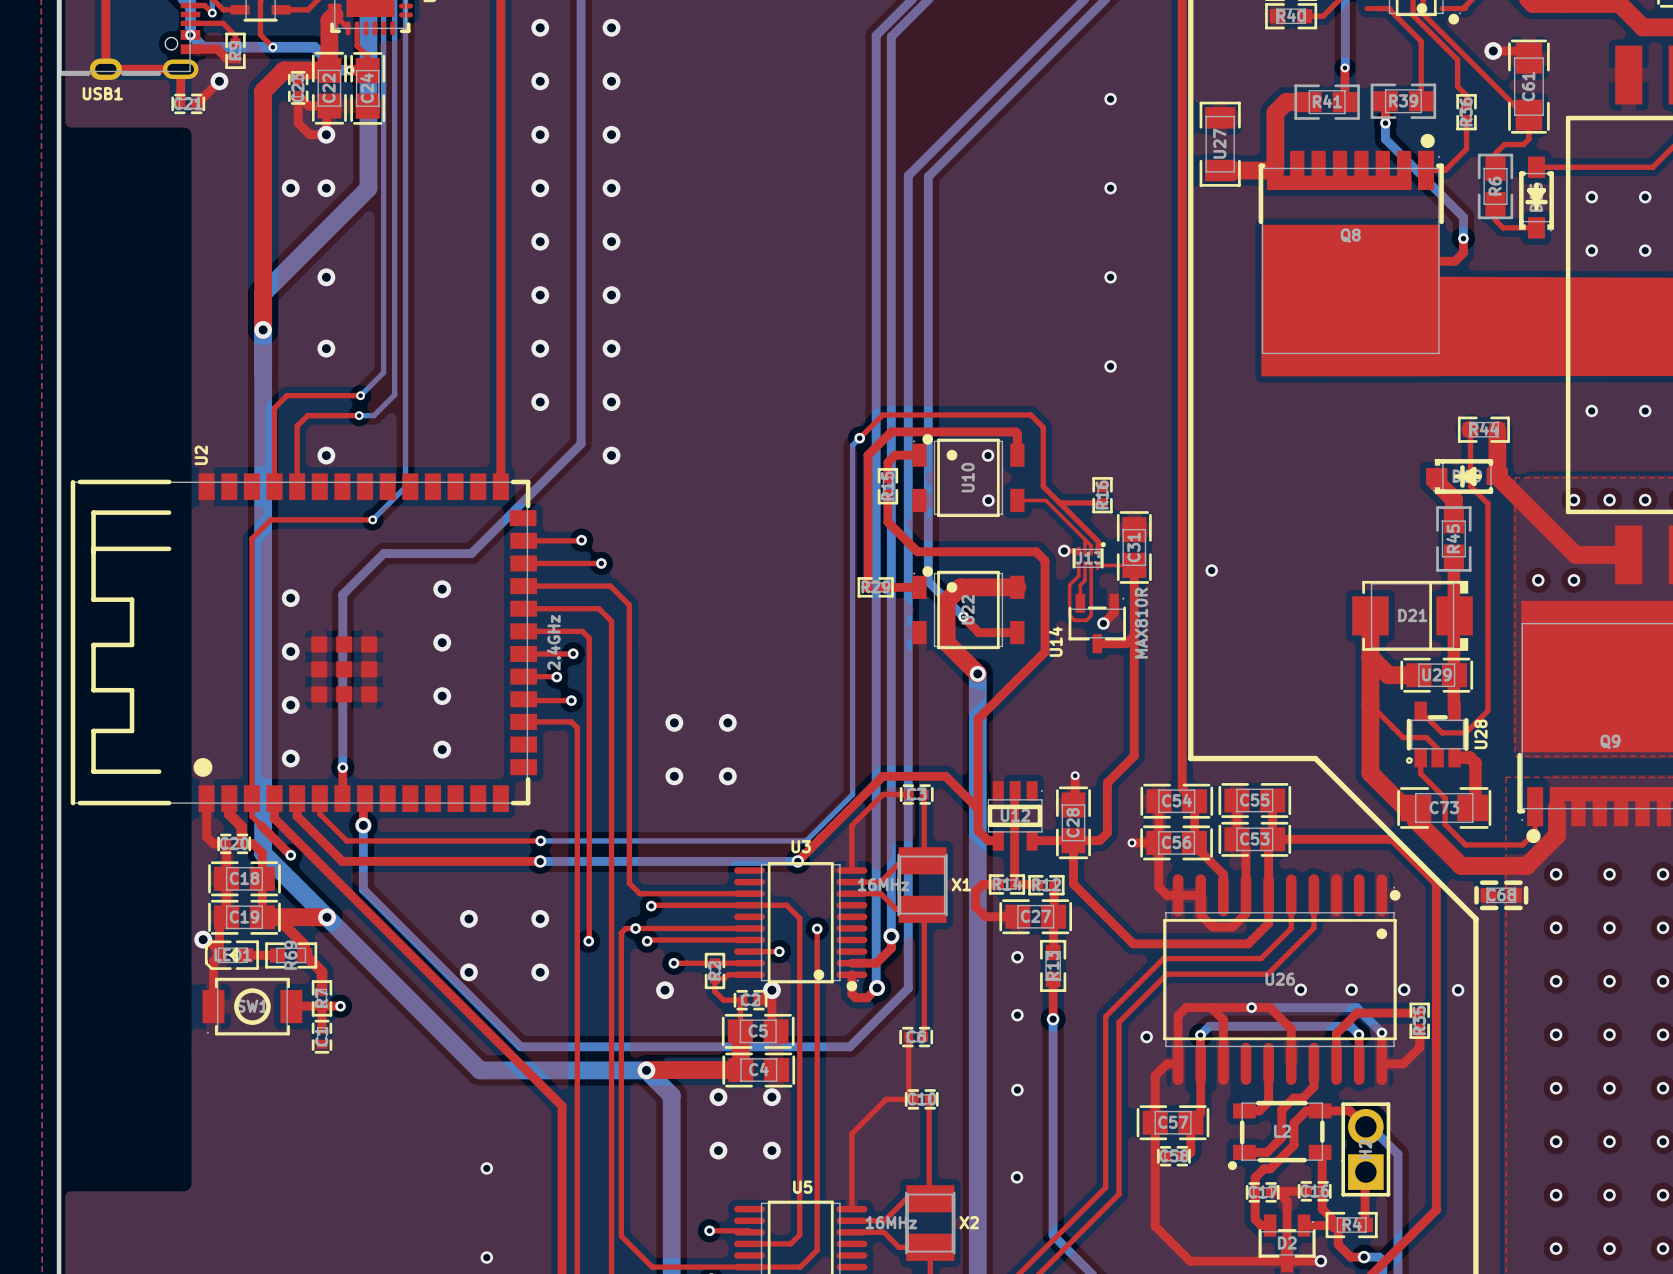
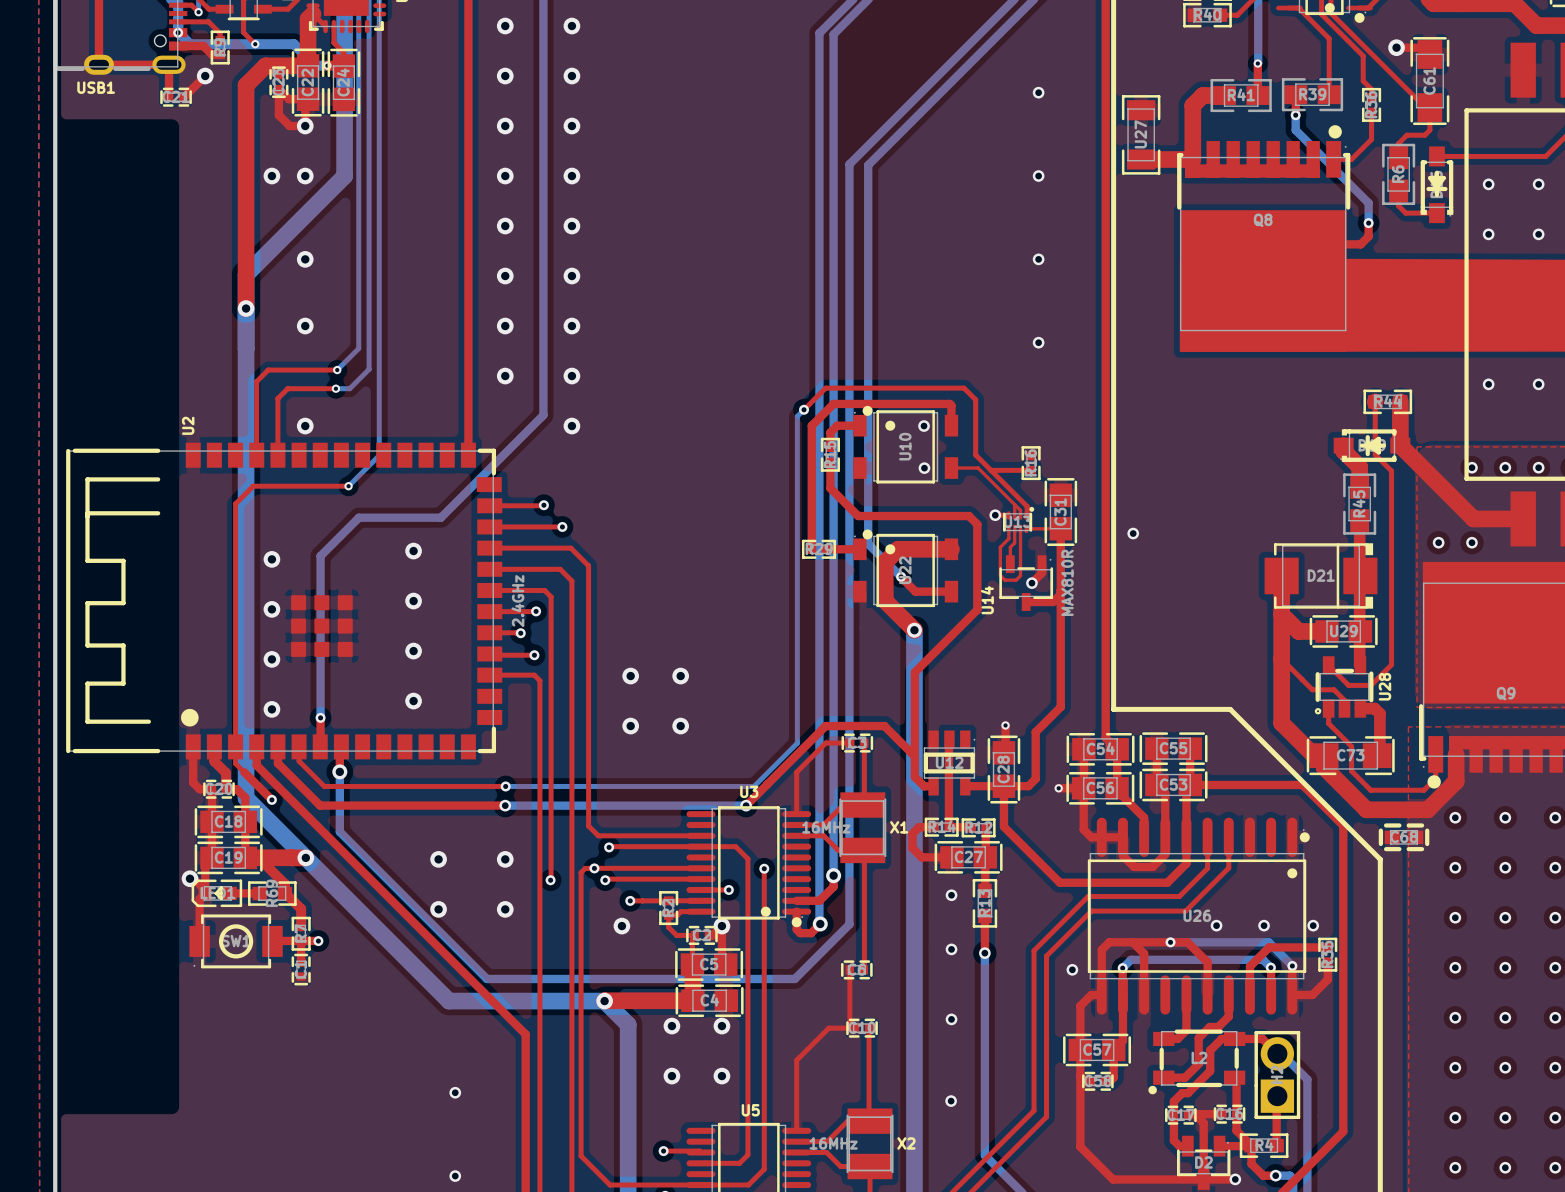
via: (1458, 990) -> none

